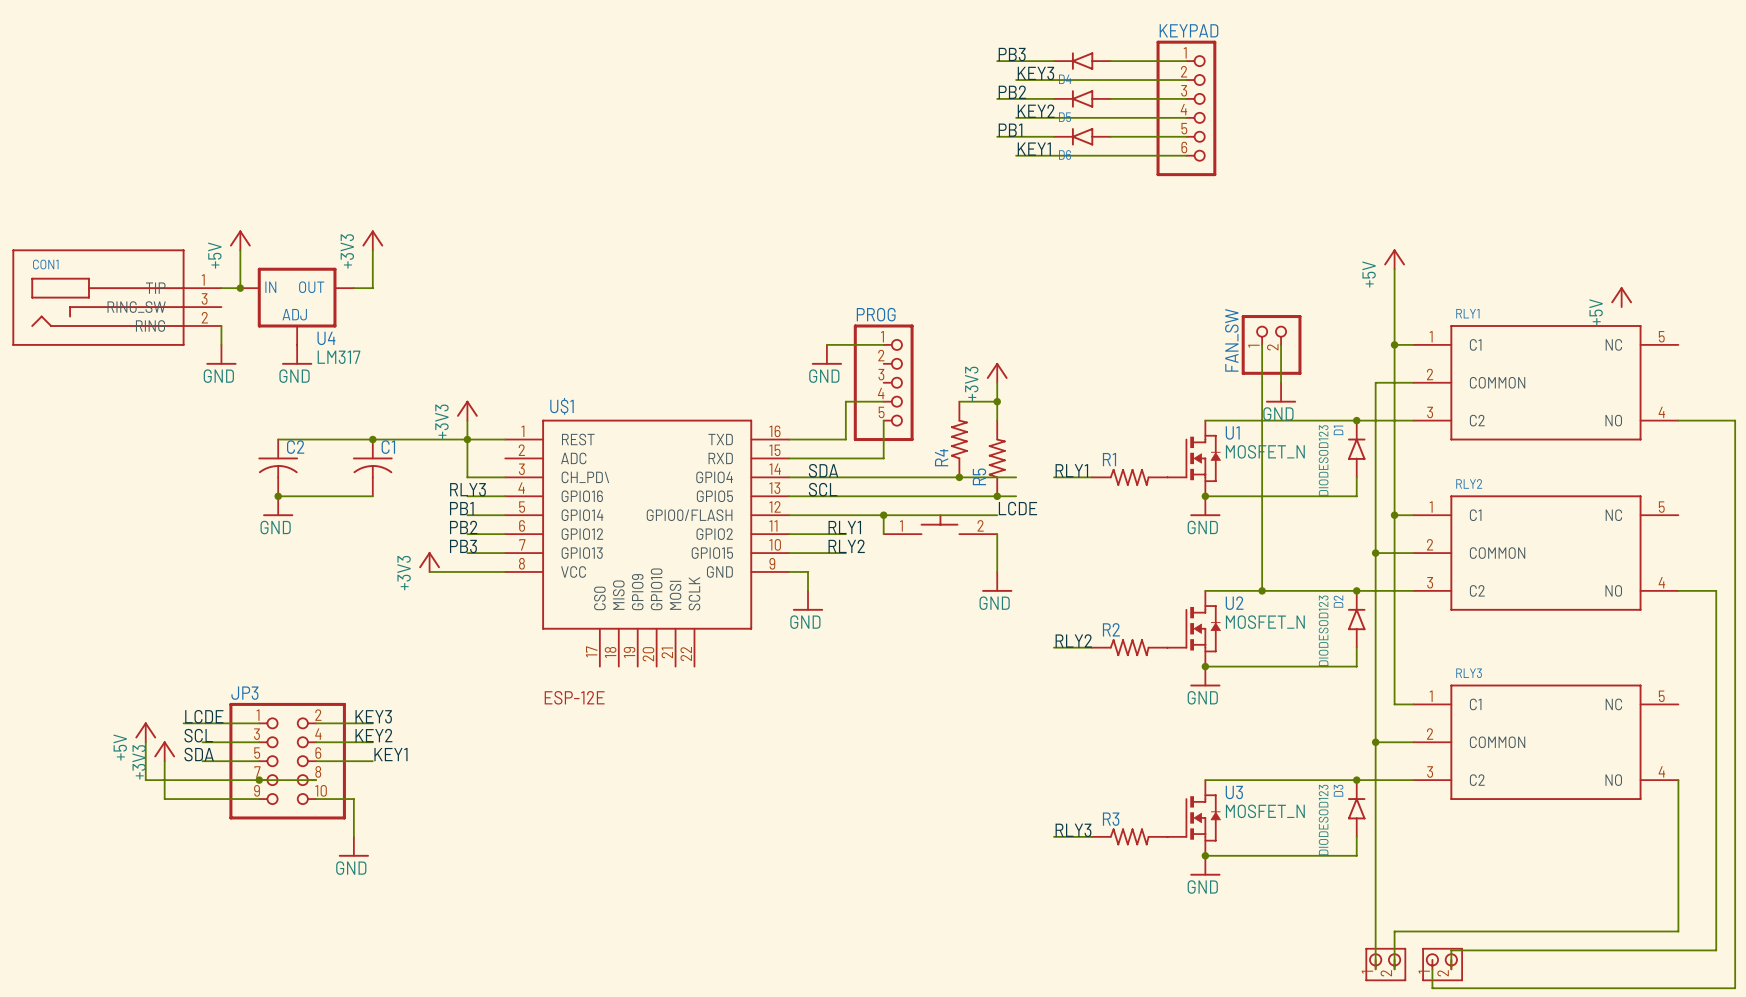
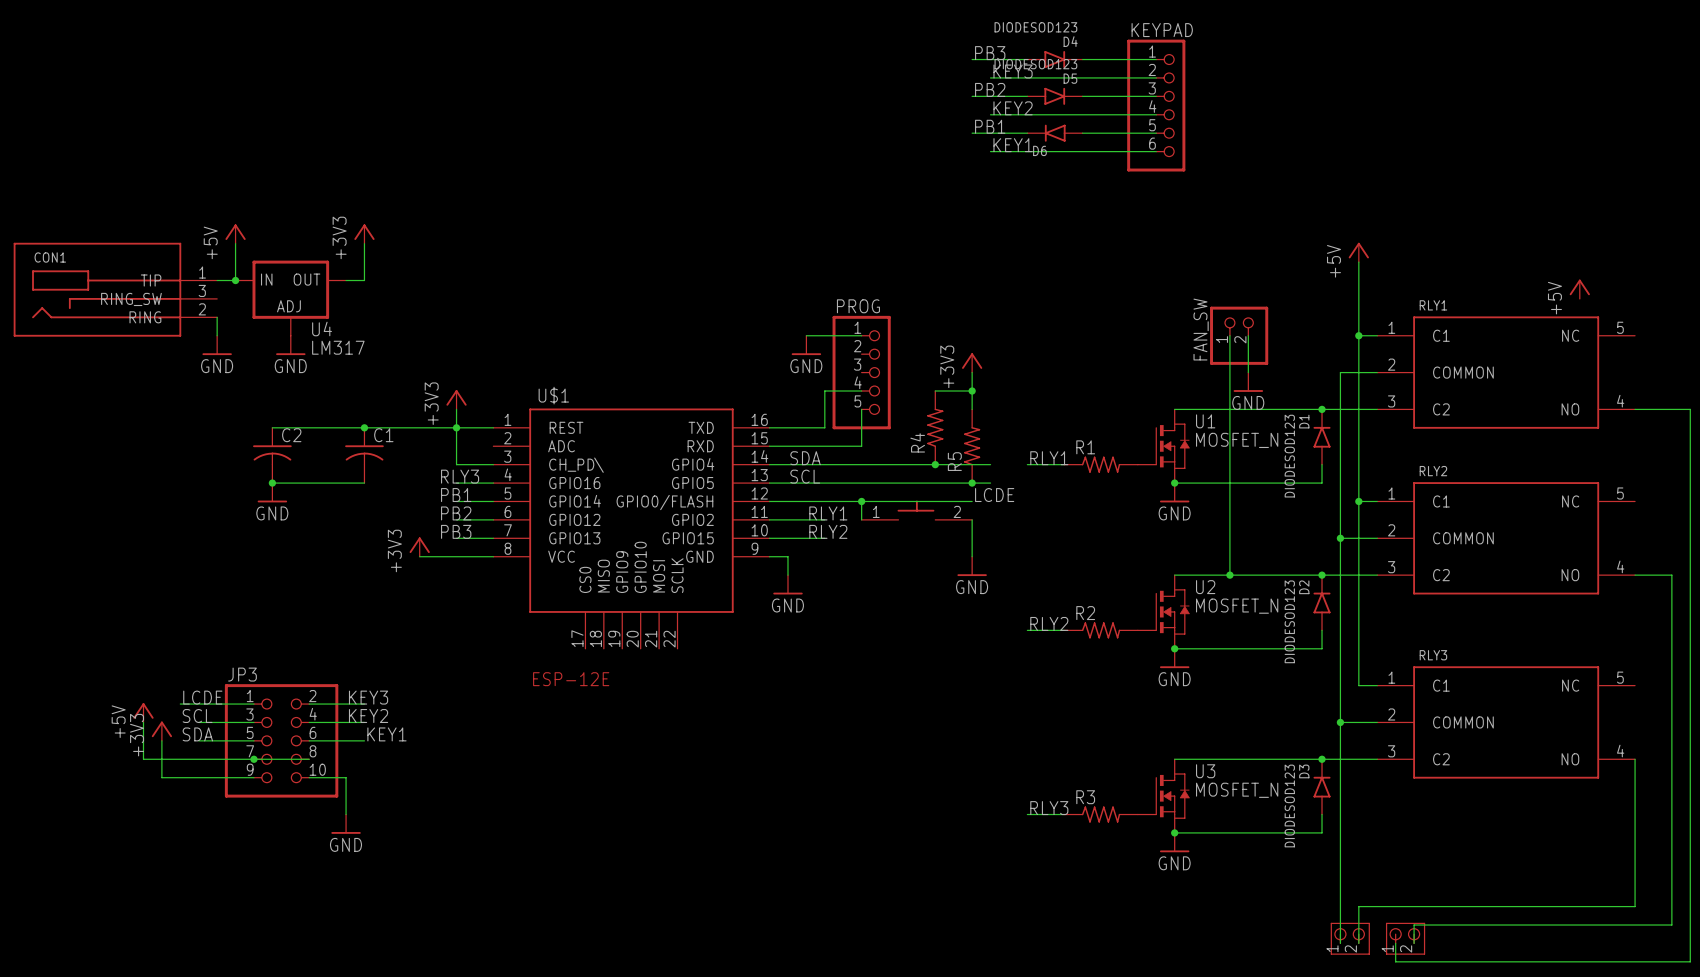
D4 value: none -> DIODESOD123 (1035, 27)
D4 rotation: 0° (1082, 61) -> 180° (1054, 59)
D5 value: none -> DIODESOD123 (1035, 64)
D5 rotation: 0° (1082, 98) -> 180° (1054, 96)

